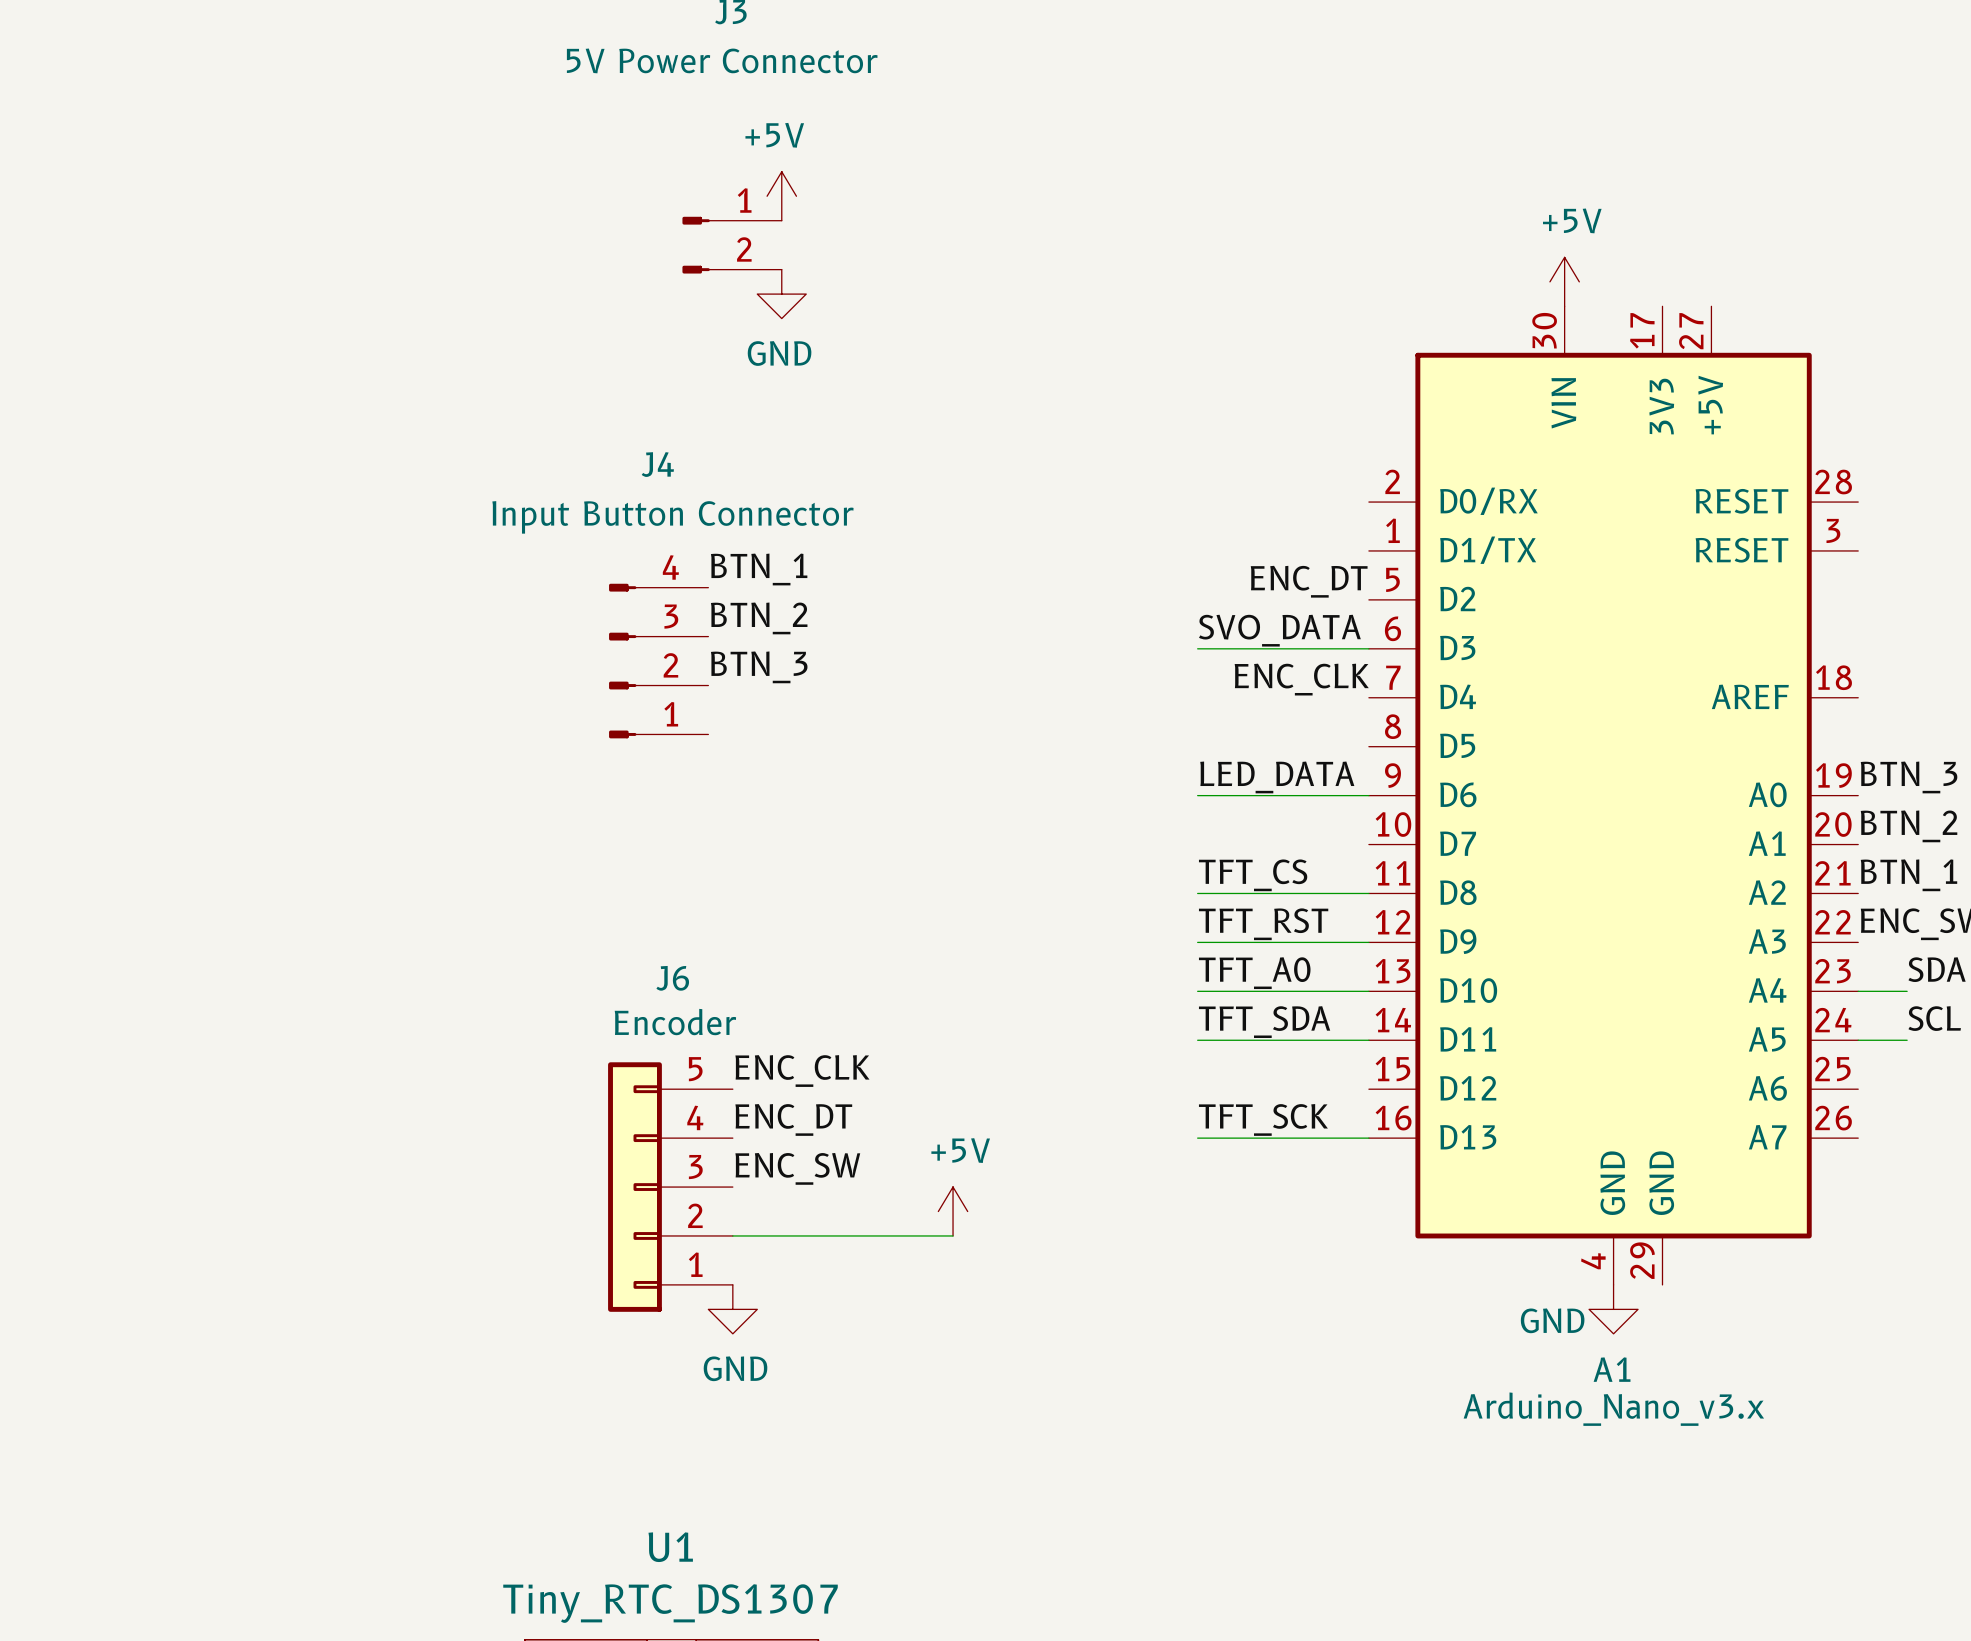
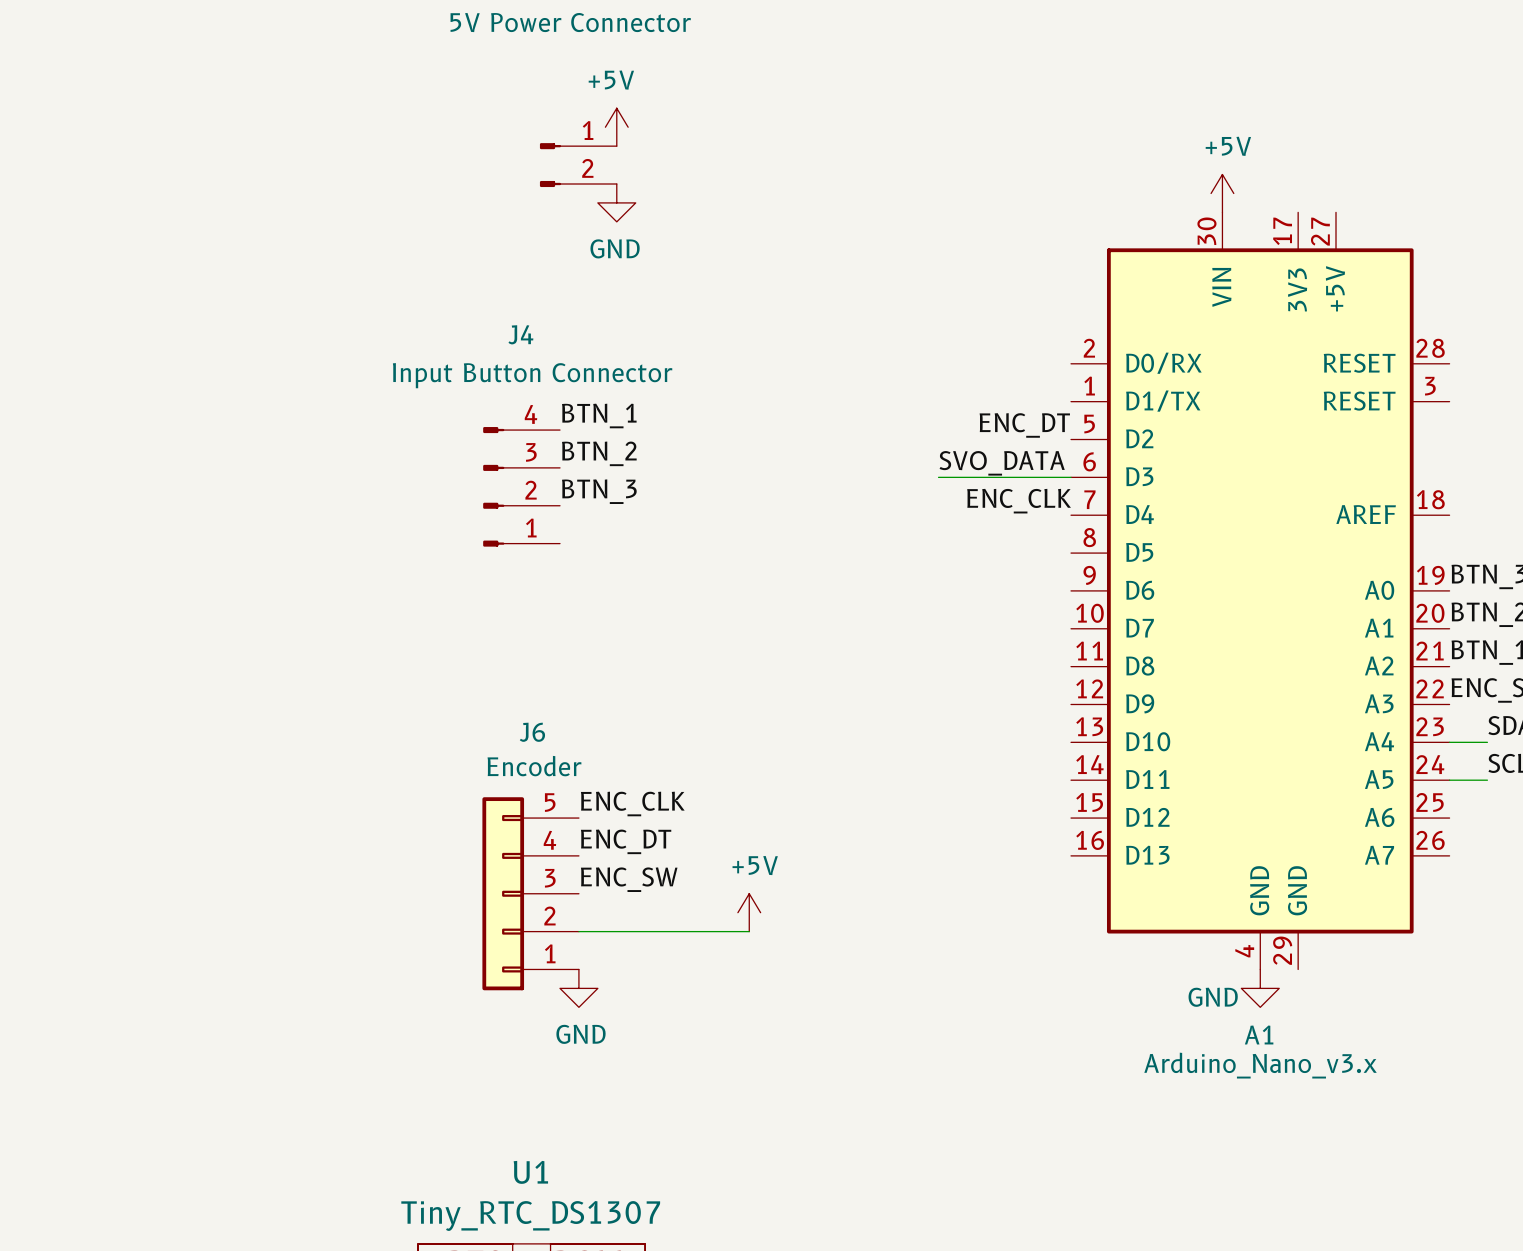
label: LED_DATA (1277, 777) -> none
wire: (1197, 795) (1368, 795) -> none
label: TFT_CS (1253, 875) -> none
wire: (1197, 893) (1368, 893) -> none
label: TFT_RST (1263, 924) -> none
wire: (1197, 942) (1368, 942) -> none
label: TFT_A0 (1254, 973) -> none
wire: (1197, 991) (1368, 991) -> none
label: TFT_SDA (1264, 1022) -> none
wire: (1197, 1040) (1368, 1040) -> none
label: TFT_SCK (1263, 1119) -> none
wire: (1197, 1138) (1368, 1138) -> none

